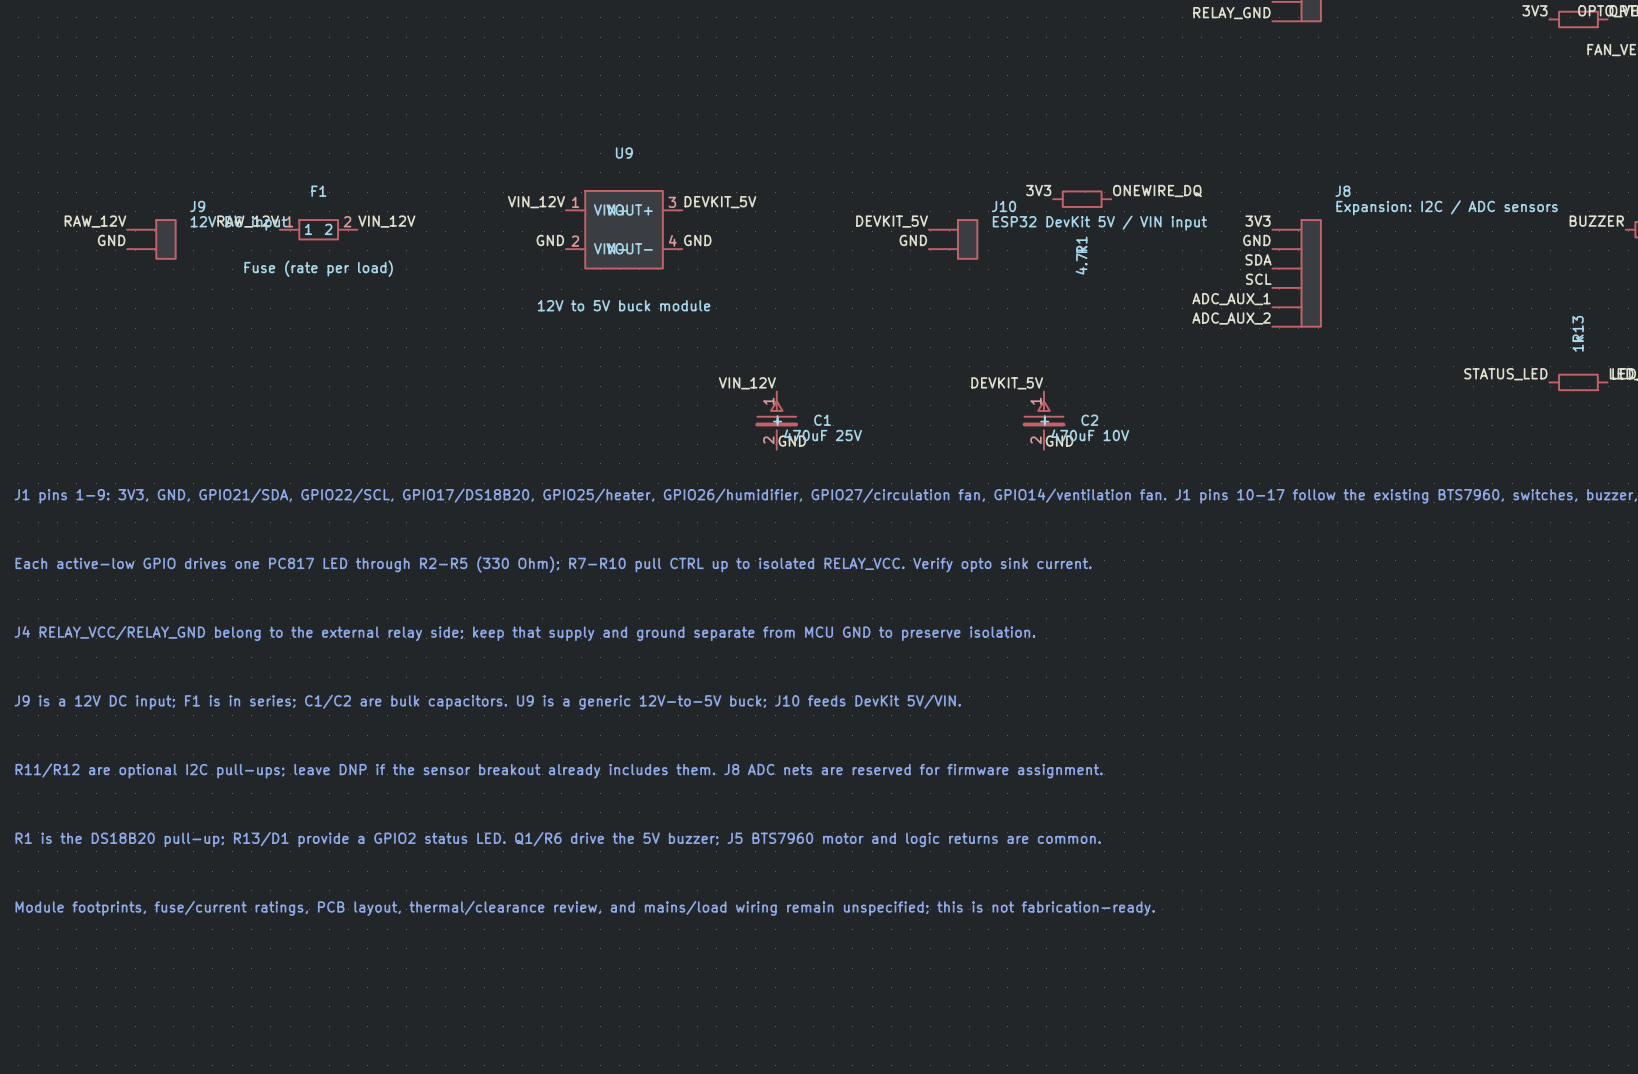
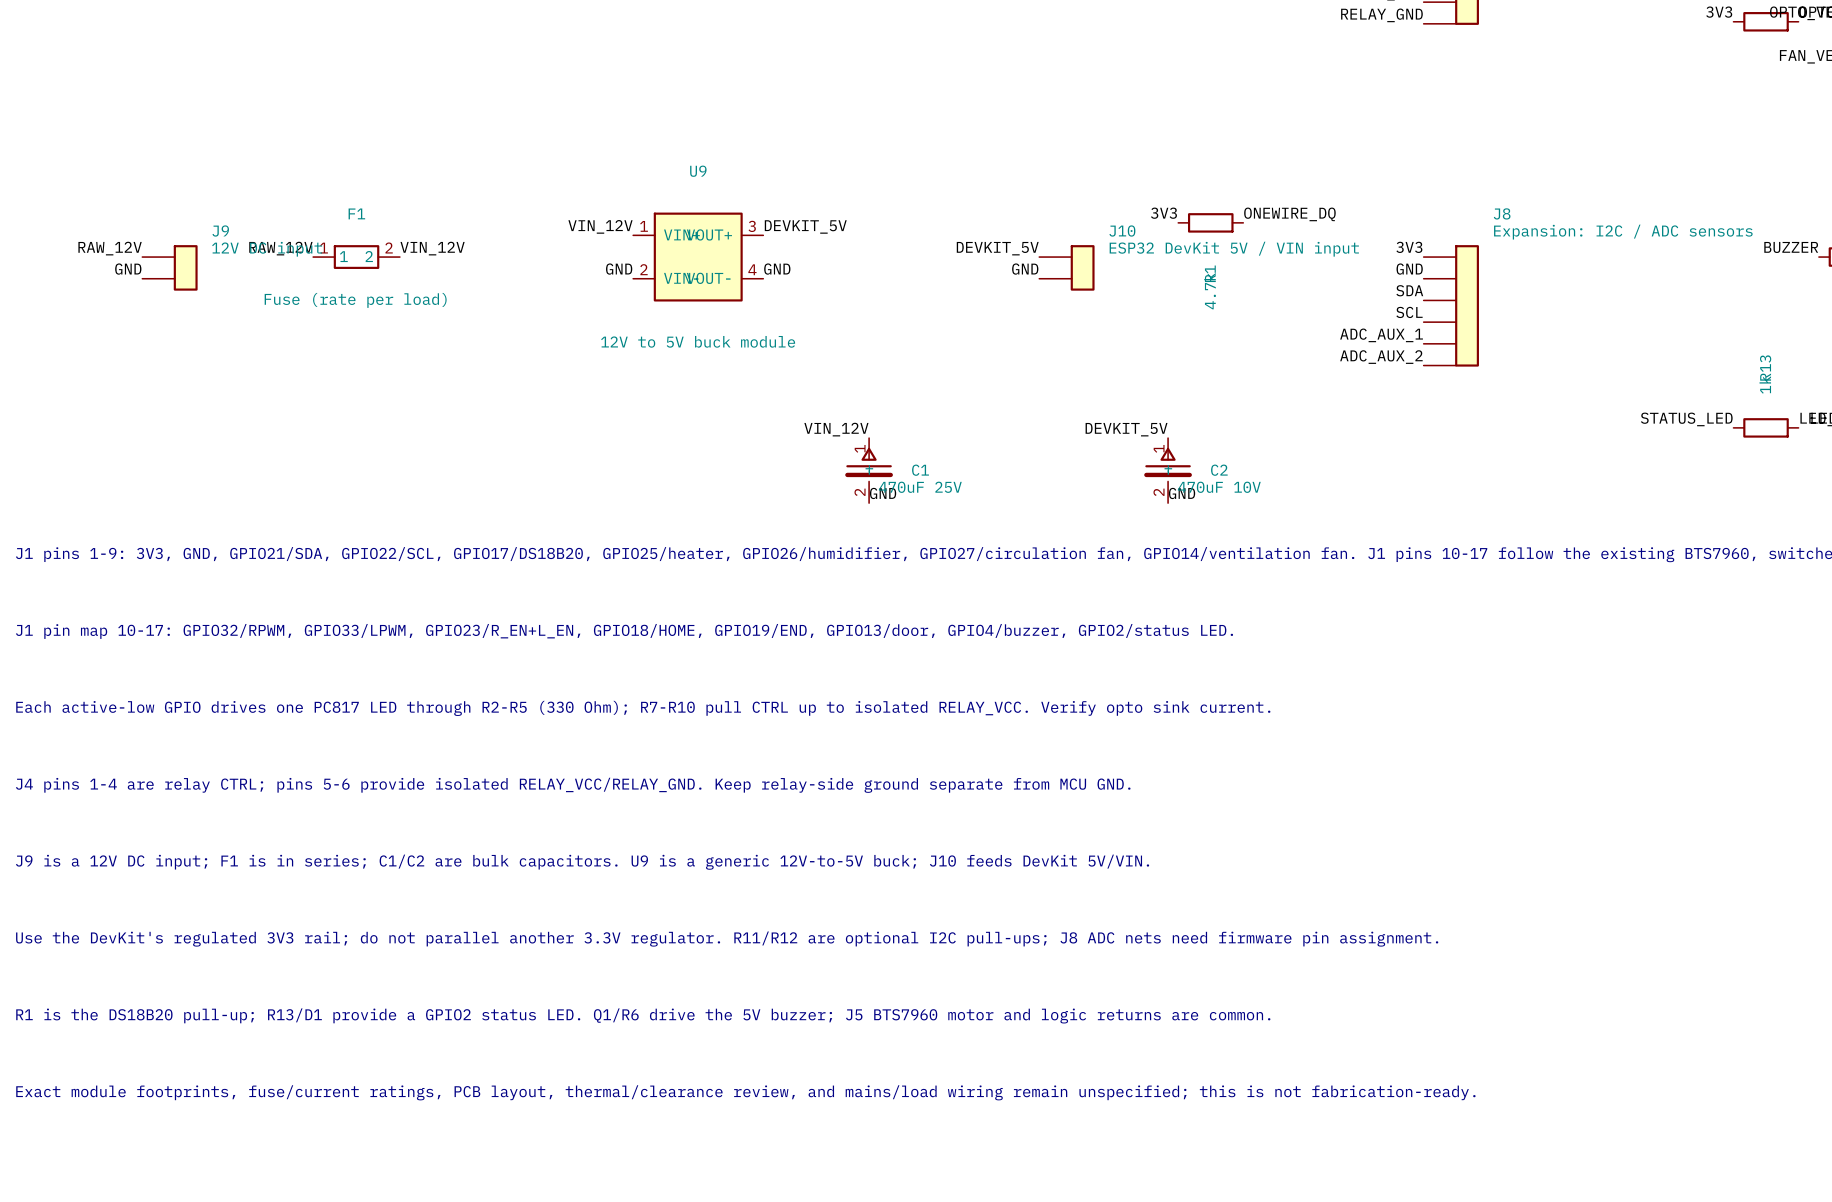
text: Each active-low GPIO drives one PC817 LED through R2-R5 (330 Ohm); R7-R10 pull CTRL up to isolated RELAY_VCC. Verify opto sink current. (553, 564) -> J1 pin map 10-17: GPIO32/RPWM, GPIO33/LPWM, GPIO23/R_EN+L_EN, GPIO18/HOME, GPIO19/END, GPIO13/door, GPIO4/buzzer, GPIO2/status LED. (624, 631)
text: J4 RELAY_VCC/RELAY_GND belong to the external relay side; keep that supply and ground separate from MCU GND to preserve isolation. (524, 633) -> Each active-low GPIO drives one PC817 LED through R2-R5 (330 Ohm); R7-R10 pull CTRL up to isolated RELAY_VCC. Verify opto sink current. (643, 708)
text: J9 is a 12V DC input; F1 is in series; C1/C2 are bulk capacitors. U9 is a generic 12V-to-5V buck; J10 feeds DevKit 5V/VIN. (487, 702) -> J4 pins 1-4 are relay CTRL; pins 5-6 provide isolated RELAY_VCC/RELAY_GND. Keep relay-side ground separate from MCU GND. (573, 785)
text: R11/R12 are optional I2C pull-ups; leave DNP if the sensor breakout already includes them. J8 ADC nets are reserved for firmware assignment. (559, 770) -> J9 is a 12V DC input; F1 is in series; C1/C2 are bulk capacitors. U9 is a generic 12V-to-5V buck; J10 feeds DevKit 5V/VIN. (582, 862)
text: R1 is the DS18B20 pull-up; R13/D1 provide a GPIO2 status LED. Q1/R6 drive the 5V buzzer; J5 BTS7960 motor and logic returns are common. (558, 839) -> Use the DevKit's regulated 3V3 rail; do not parallel another 3.3V regulator. R11/R12 are optional I2C pull-ups; J8 ADC nets need firmware pin assignment. (727, 939)
text: Module footprints, fuse/current ratings, PCB layout, thermal/clearance review, and mains/load wiring remain unspecified; this is not fabrication-ready. (585, 908) -> R1 is the DS18B20 pull-up; R13/D1 provide a GPIO2 status LED. Q1/R6 drive the 5V buzzer; J5 BTS7960 motor and logic returns are common. (643, 1015)
text: none -> Exact module footprints, fuse/current ratings, PCB layout, thermal/clearance review, and mains/load wiring remain unspecified; this is not fabrication-ready. (745, 1092)

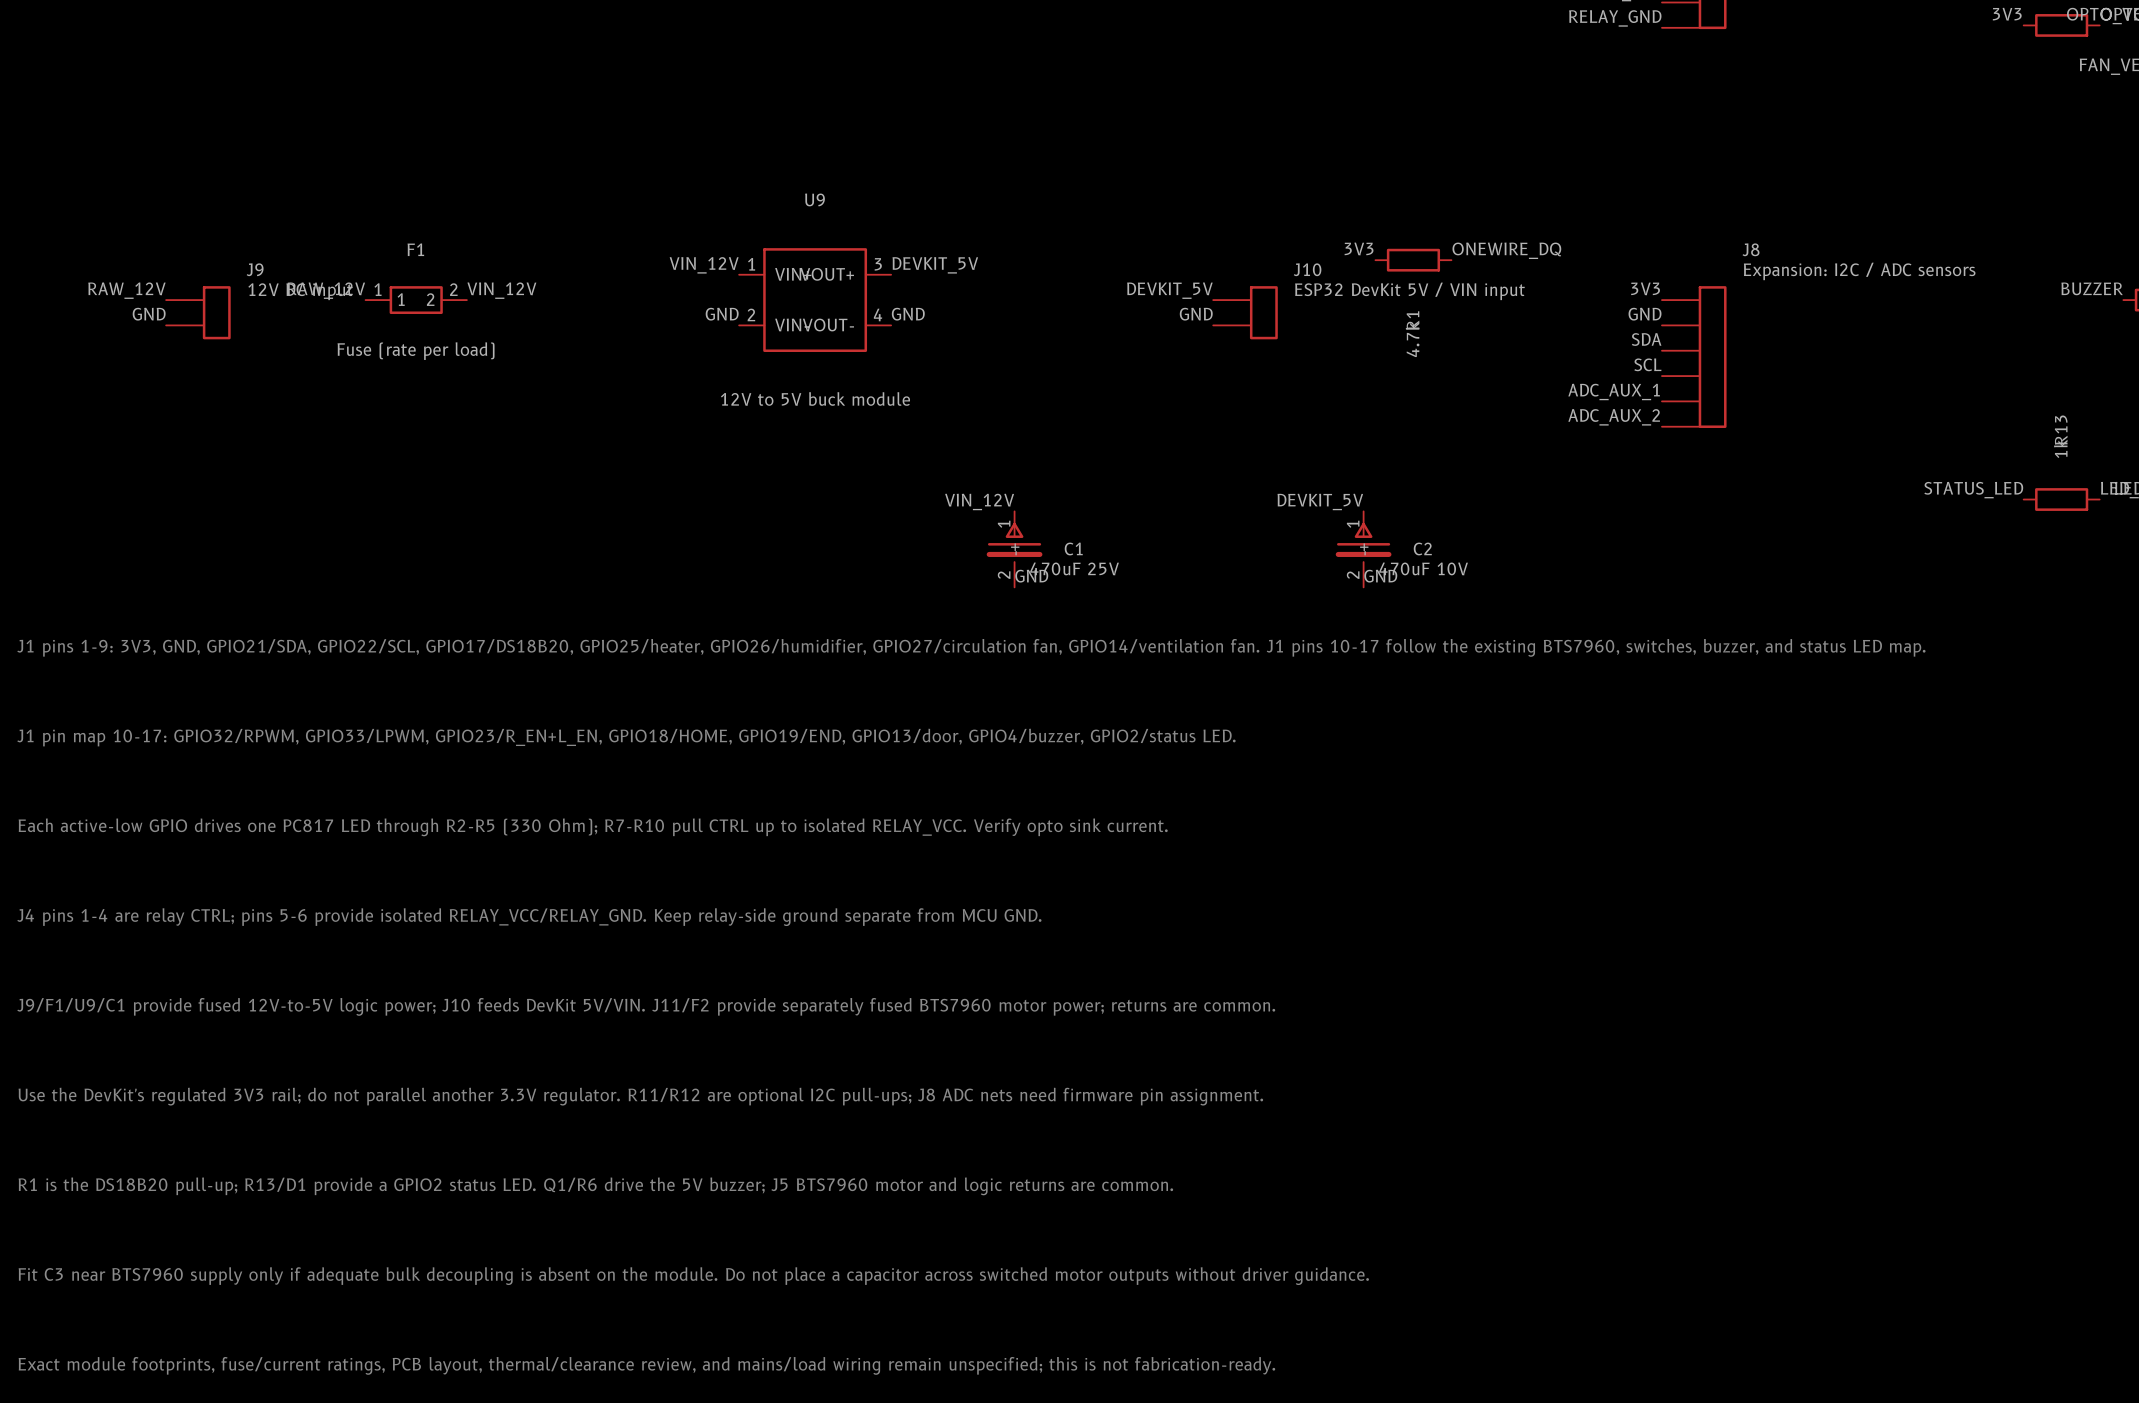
text: J9 is a 12V DC input; F1 is in series; C1/C2 are bulk capacitors. U9 is a generic 12V-to-5V buck; J10 feeds DevKit 5V/VIN. (582, 862) -> J9/F1/U9/C1 provide fused 12V-to-5V logic power; J10 feeds DevKit 5V/VIN. J11/F2 provide separately fused BTS7960 motor power; returns are common. (646, 1006)
text: Exact module footprints, fuse/current ratings, PCB layout, thermal/clearance review, and mains/load wiring remain unspecified; this is not fabrication-ready. (745, 1092) -> Fit C3 near BTS7960 supply only if adequate bulk decoupling is absent on the module. Do not place a capacitor across switched motor outputs without driver guidance. (693, 1276)
text: none -> Exact module footprints, fuse/current ratings, PCB layout, thermal/clearance review, and mains/load wiring remain unspecified; this is not fabrication-ready. (646, 1365)

